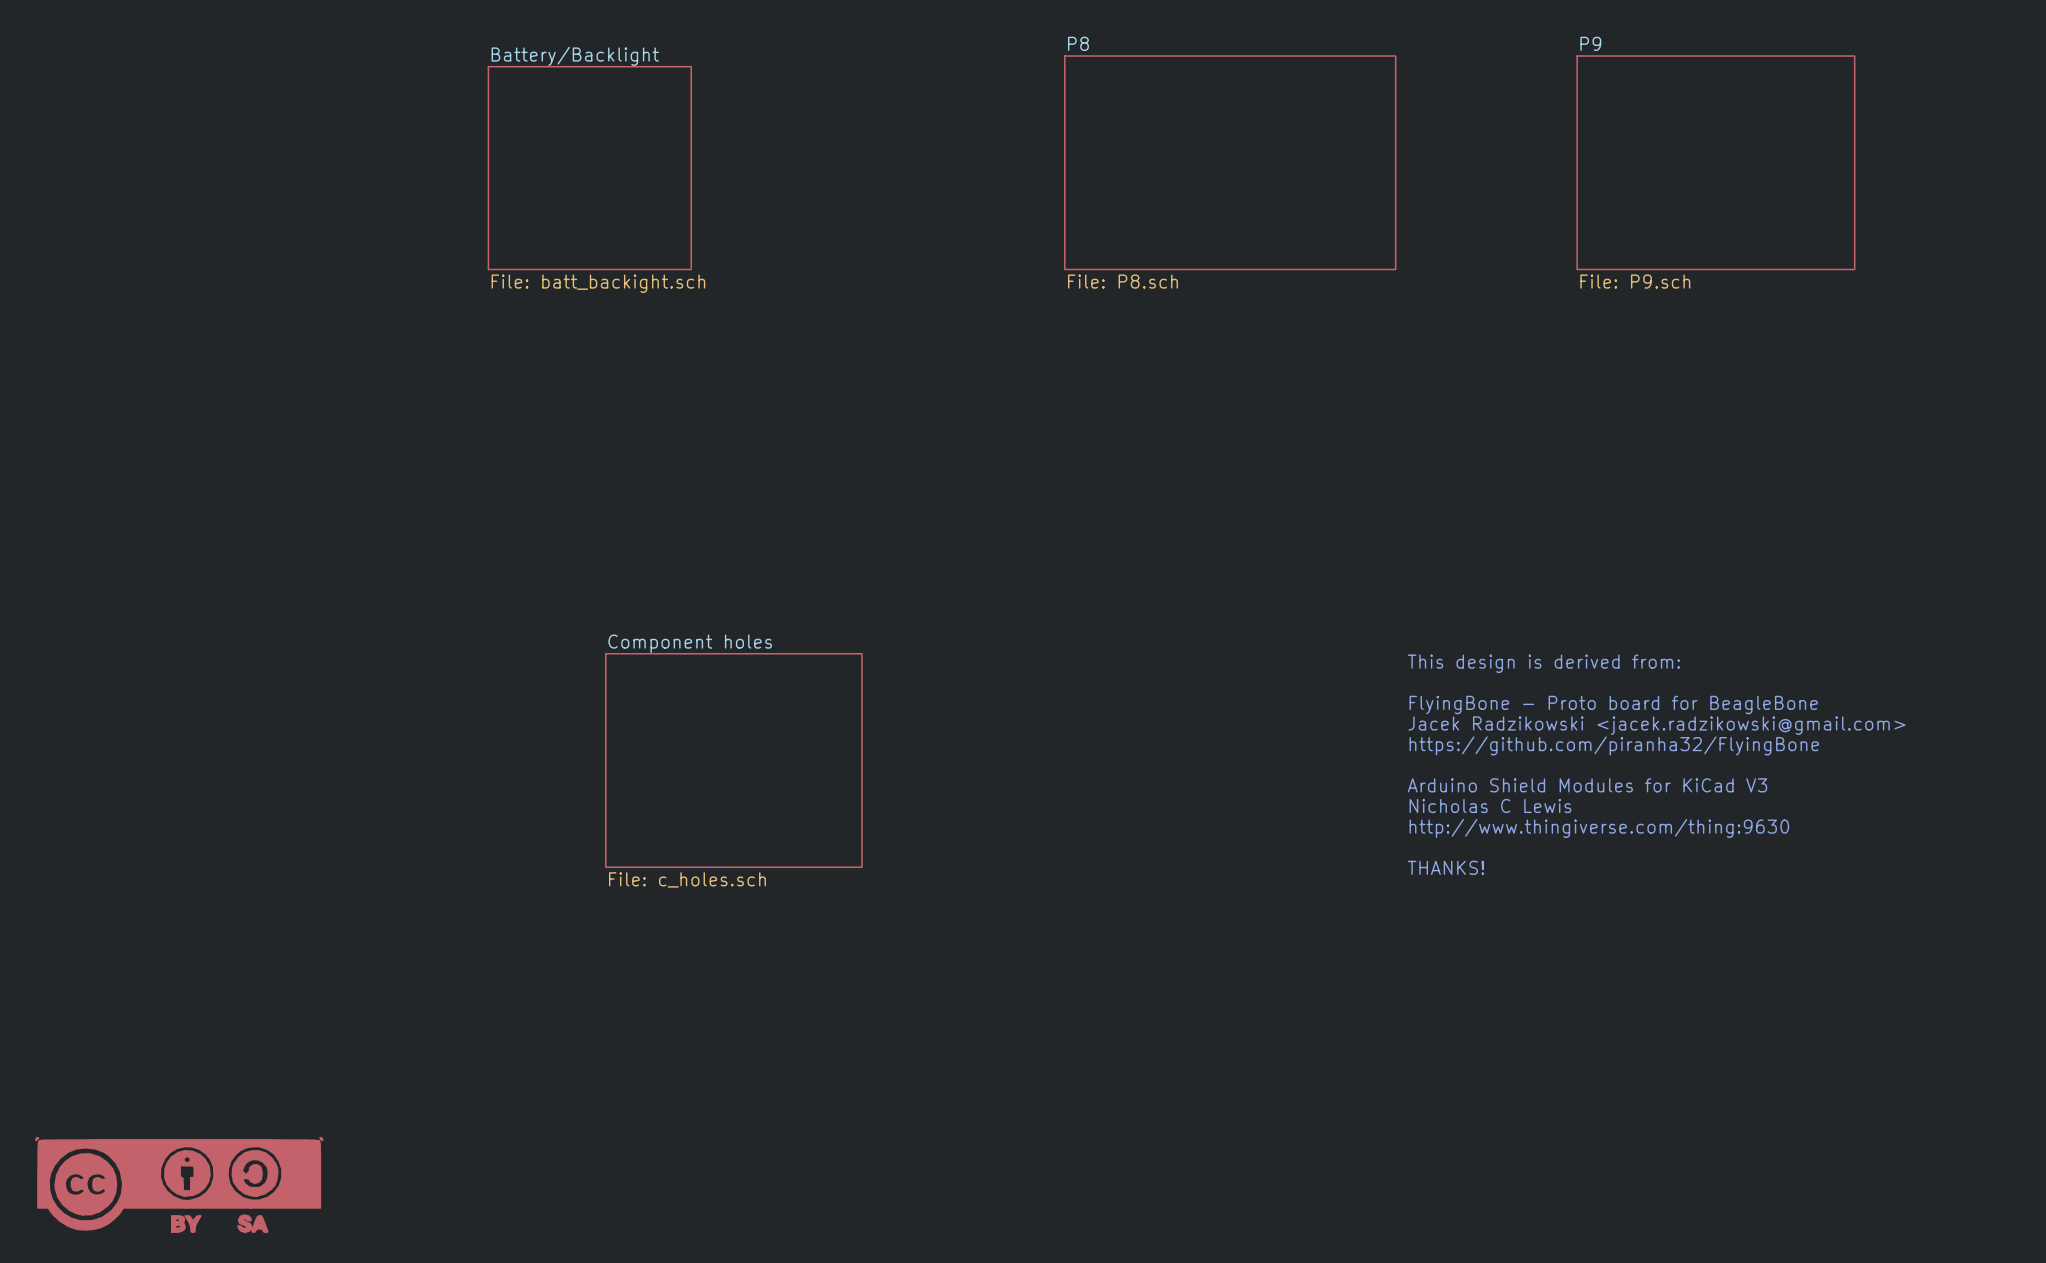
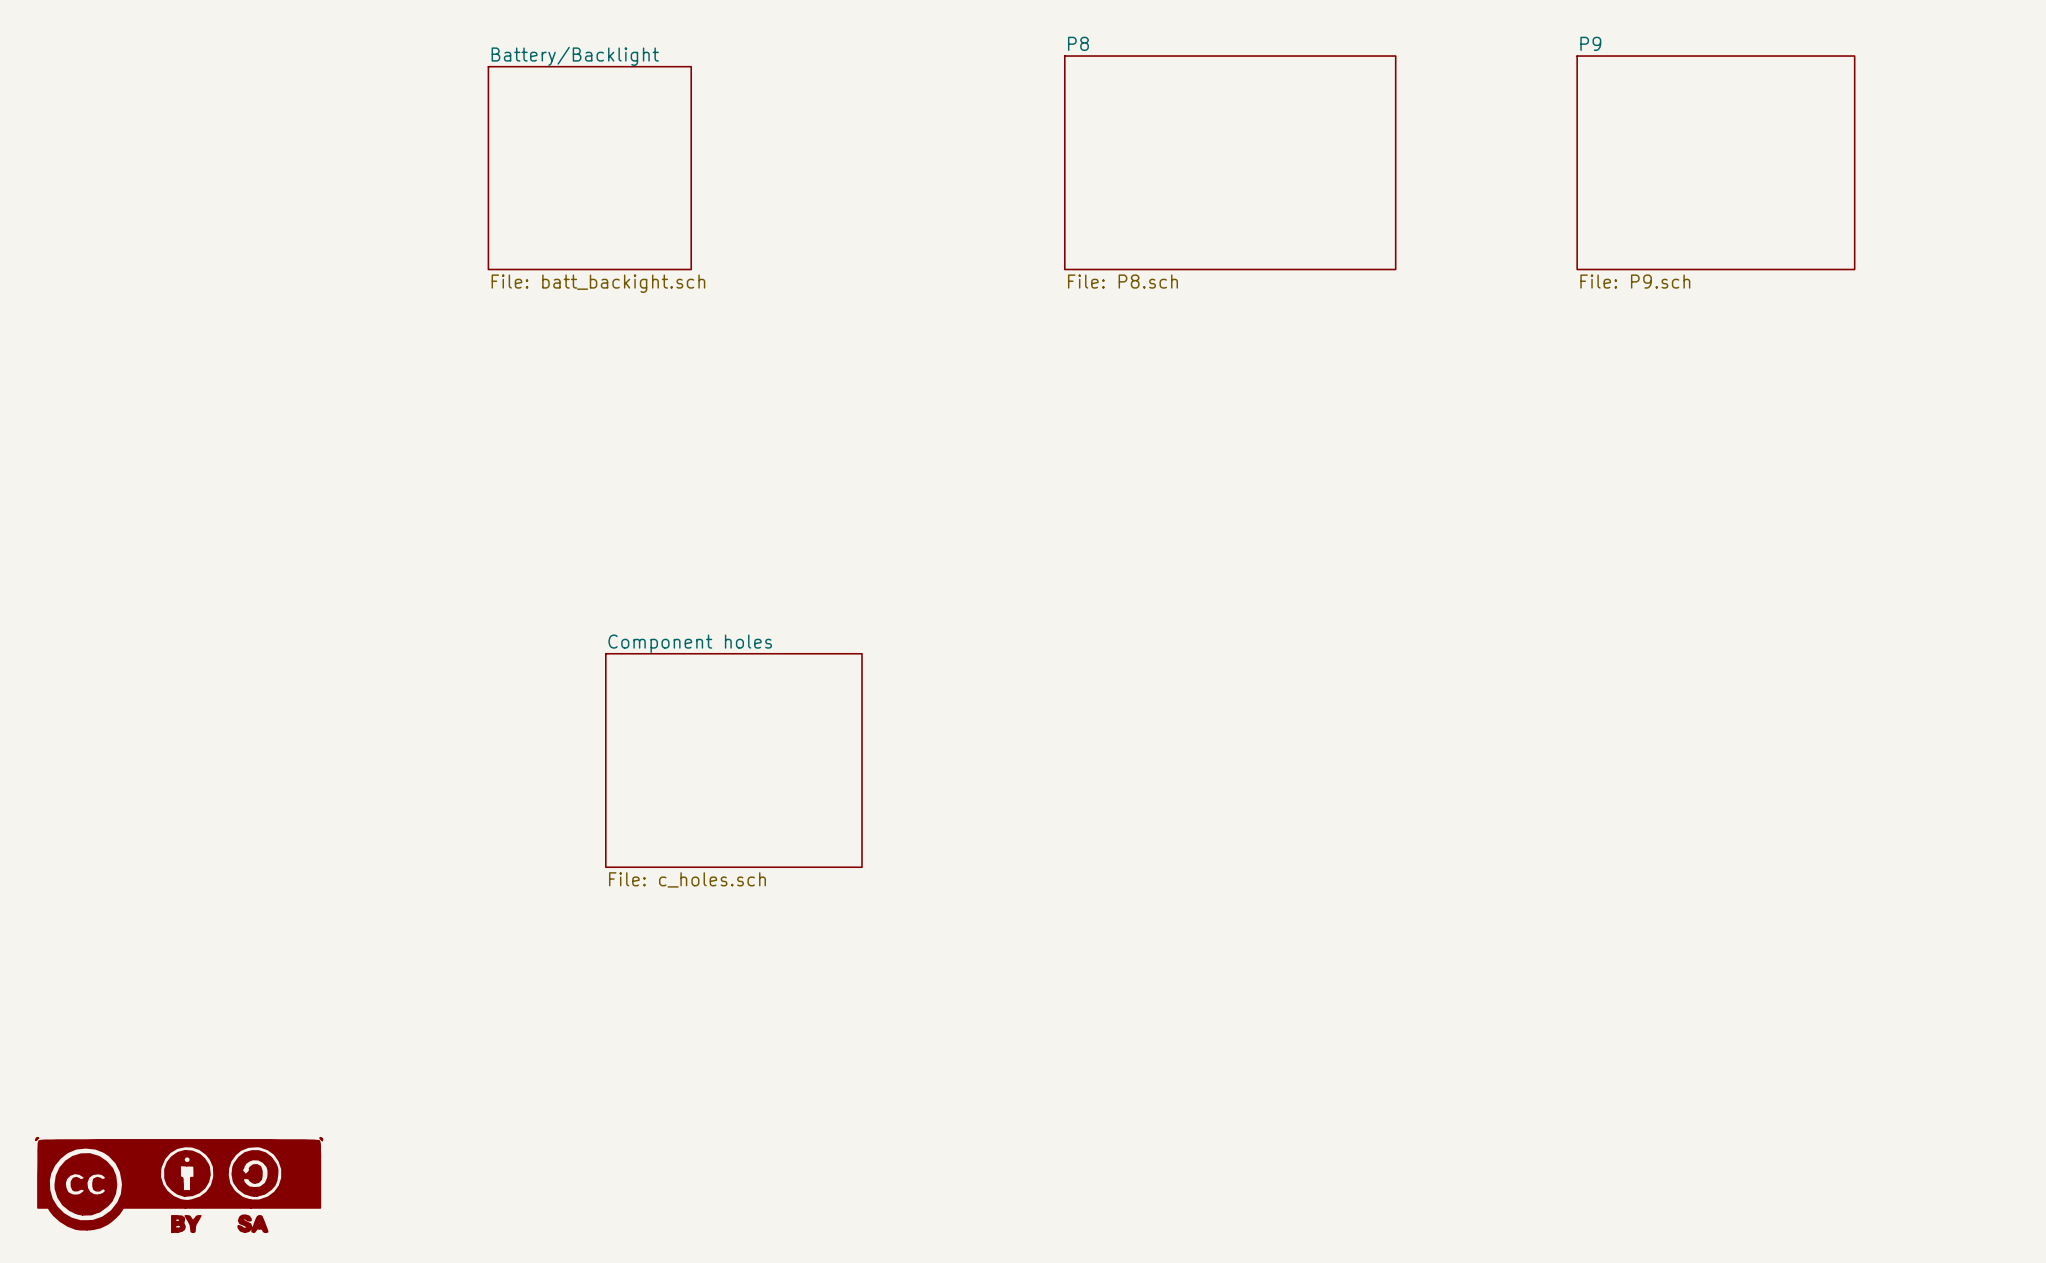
text: This design is derived from: (1543, 663) -> none
text: FlyingBone - Proto board for BeagleBone (1613, 704) -> none
text: Jacek Radzikowski <jacek.radzikowski@gmail.com> (1656, 725) -> none
text: https://github.com/piranha32/FlyingBone (1614, 745) -> none
text: Arduino Shield Modules for KiCad V3 (1587, 785) -> none
text: Nicholas C Lewis (1490, 805) -> none
text: http://www.thingiverse.com/thing:9630 (1599, 828) -> none
text: THANKS! (1445, 867) -> none

